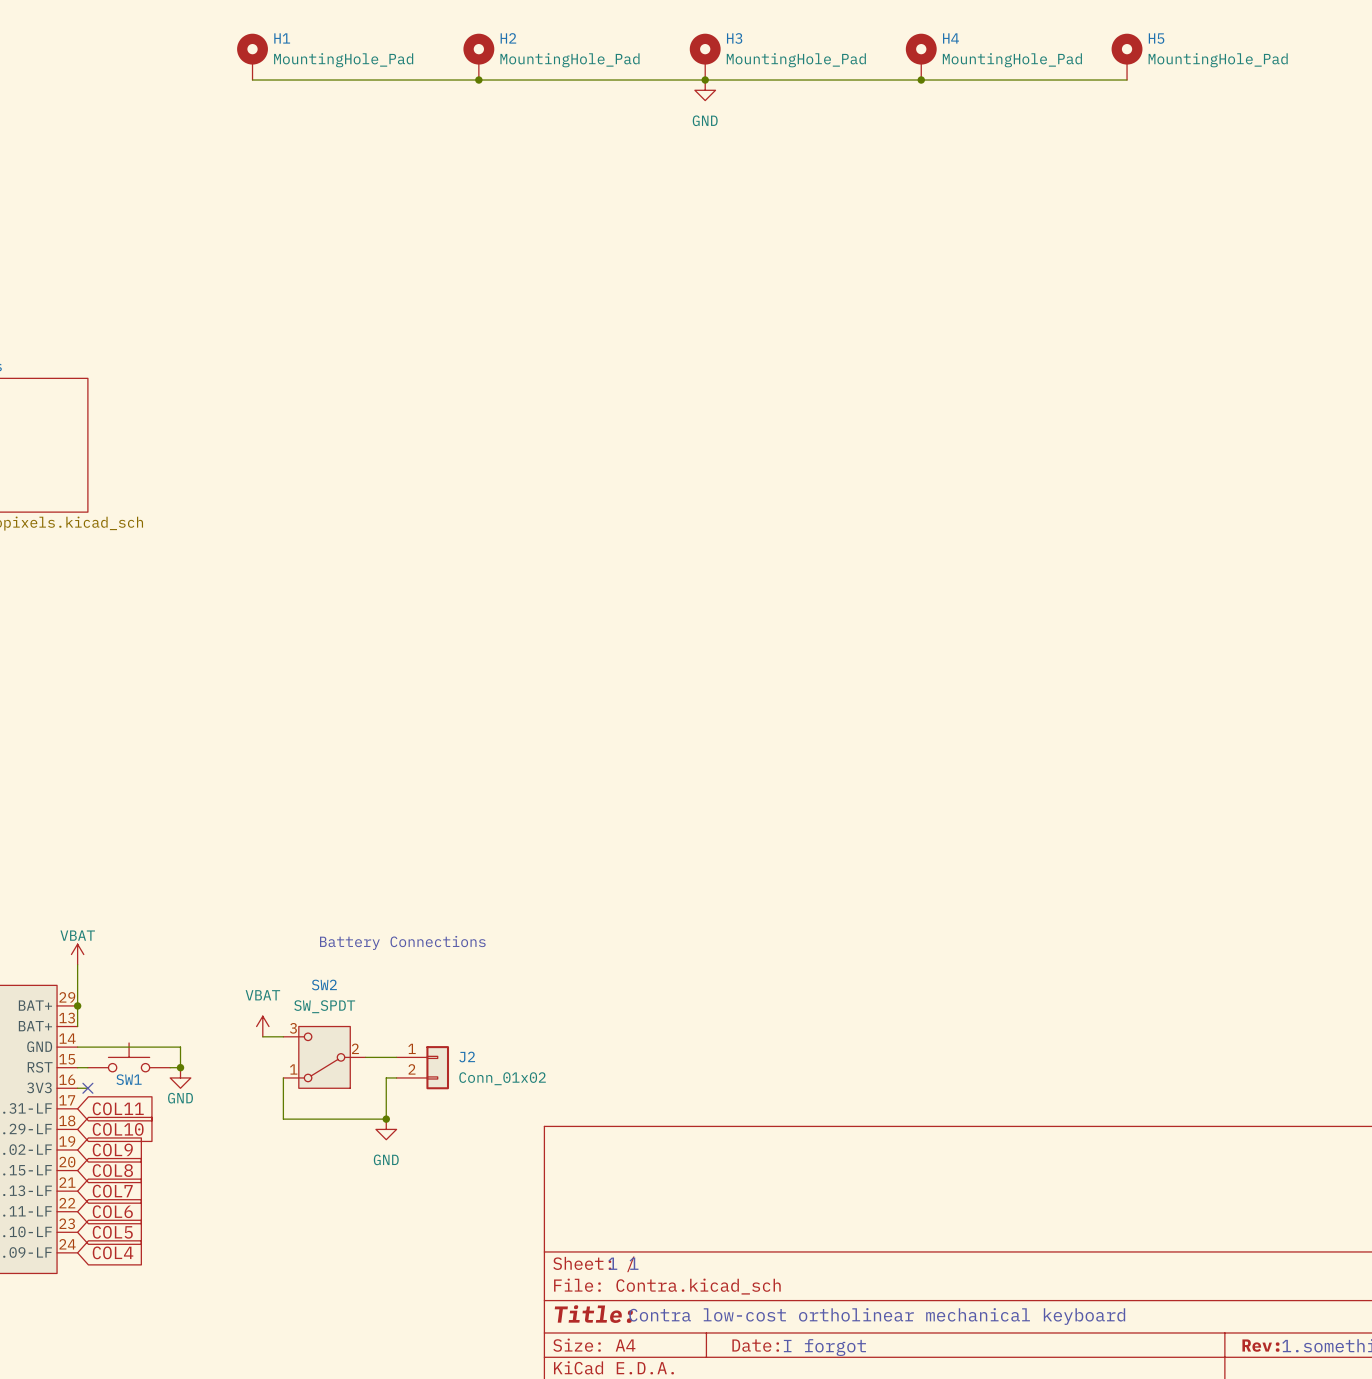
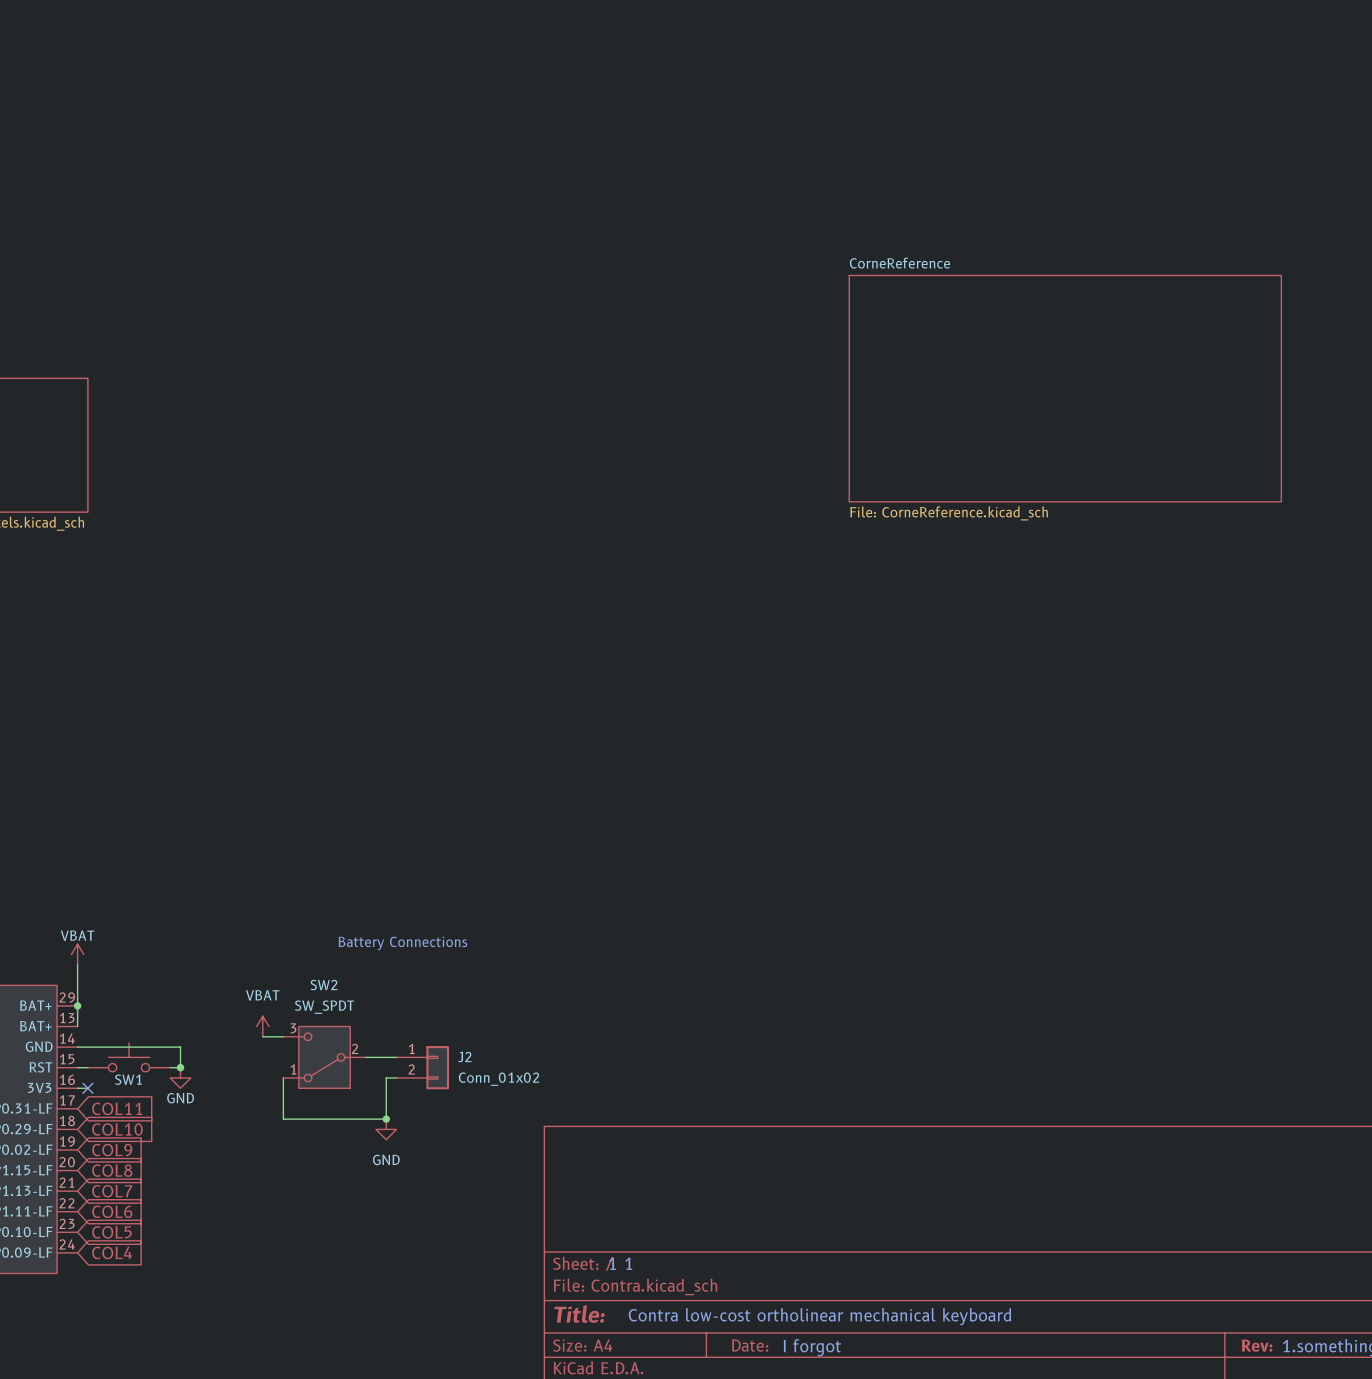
H1: MountingHole_Pad (252, 56) -> none
H2: MountingHole_Pad (478, 56) -> none
H3: MountingHole_Pad (705, 56) -> none
H4: MountingHole_Pad (921, 56) -> none
H5: MountingHole_Pad (1127, 56) -> none
wire: (252, 80) (1127, 80) -> none
junction: (478, 80) -> none
junction: (705, 80) -> none
junction: (921, 80) -> none
power symbol: GND (705, 90) -> none
sheet CorneReference: none -> File: CorneReference.kicad_sch (1065, 388)

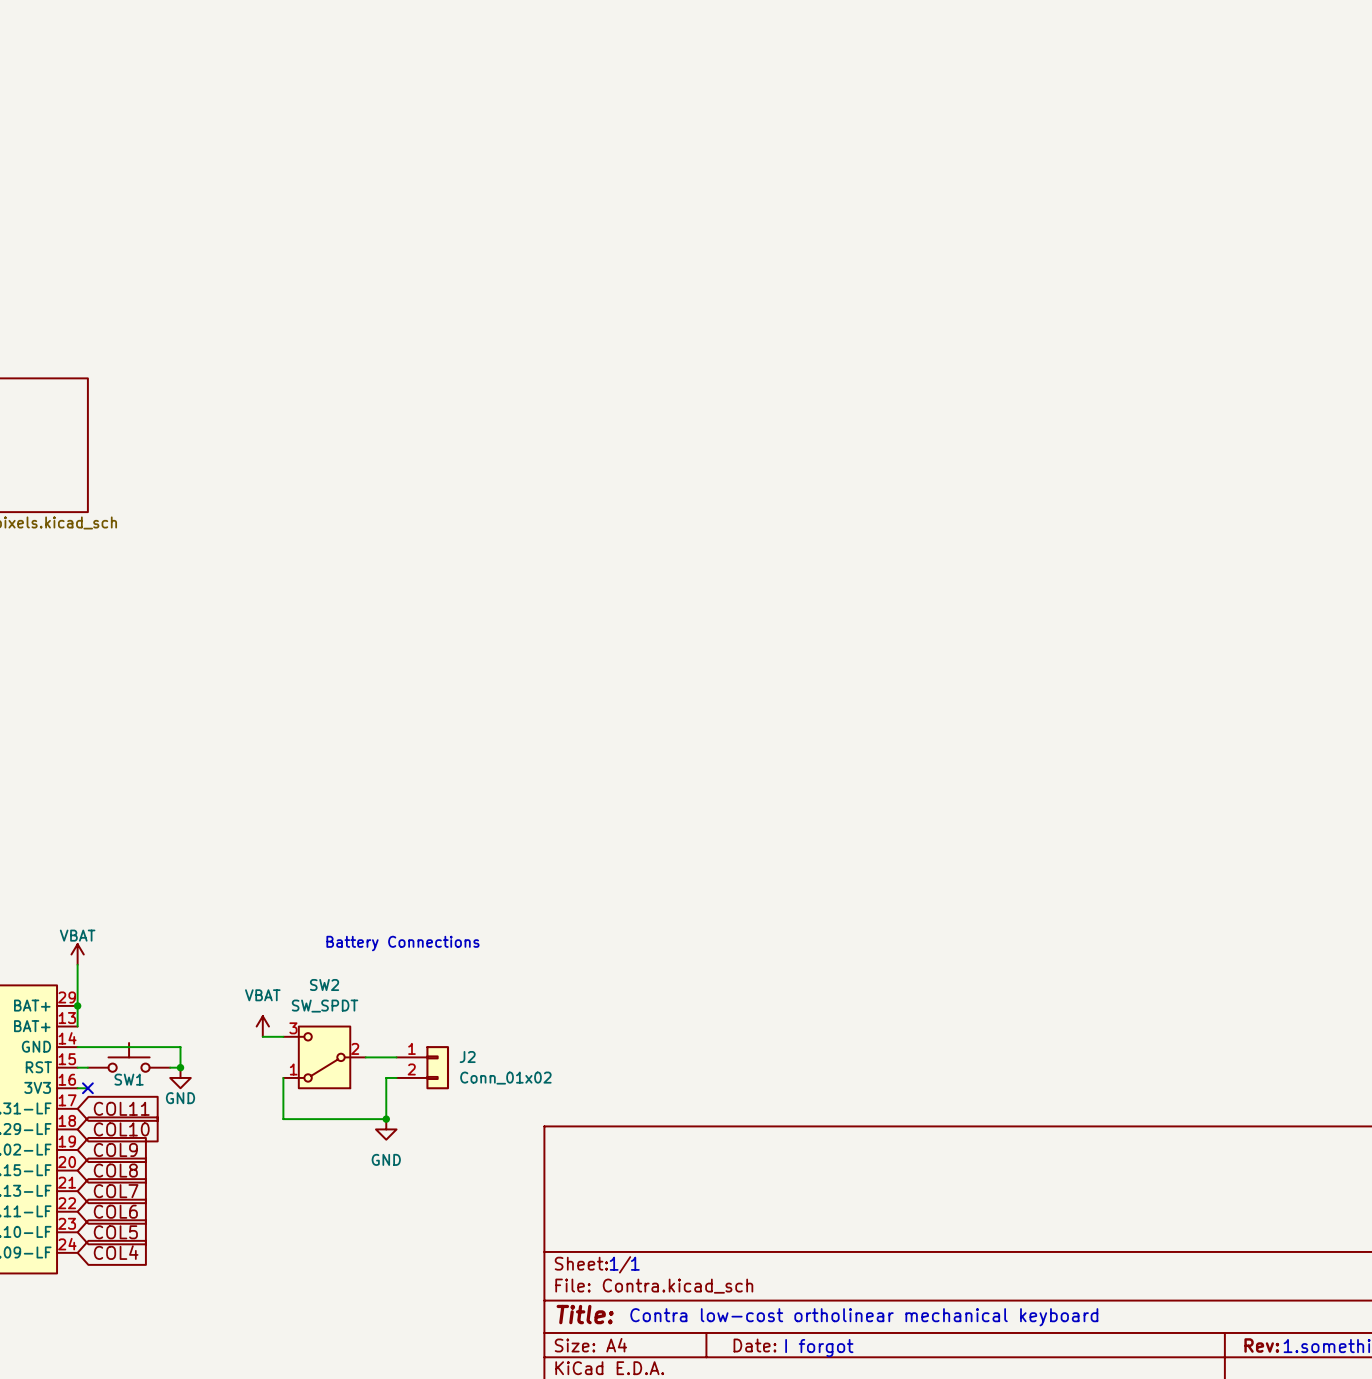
sheet CorneReference: File: CorneReference.kicad_sch (1065, 388) -> none

